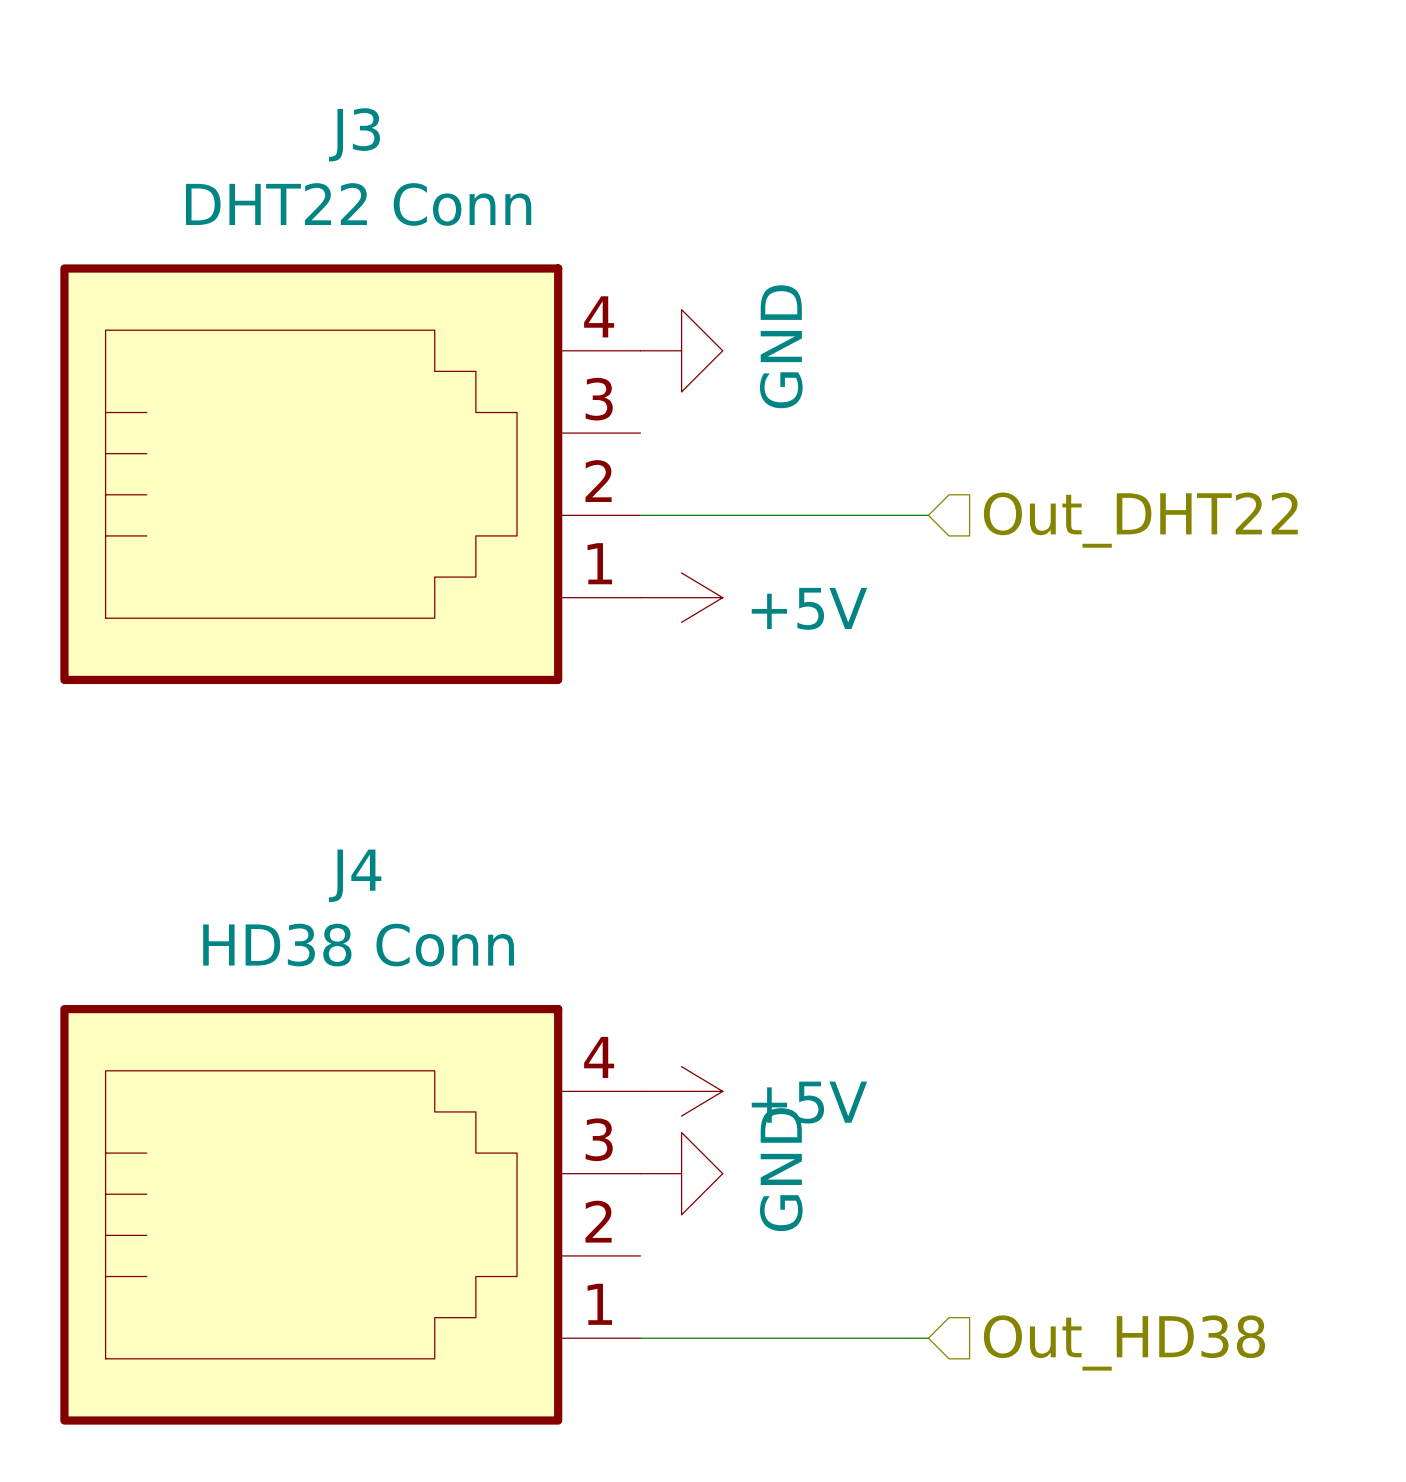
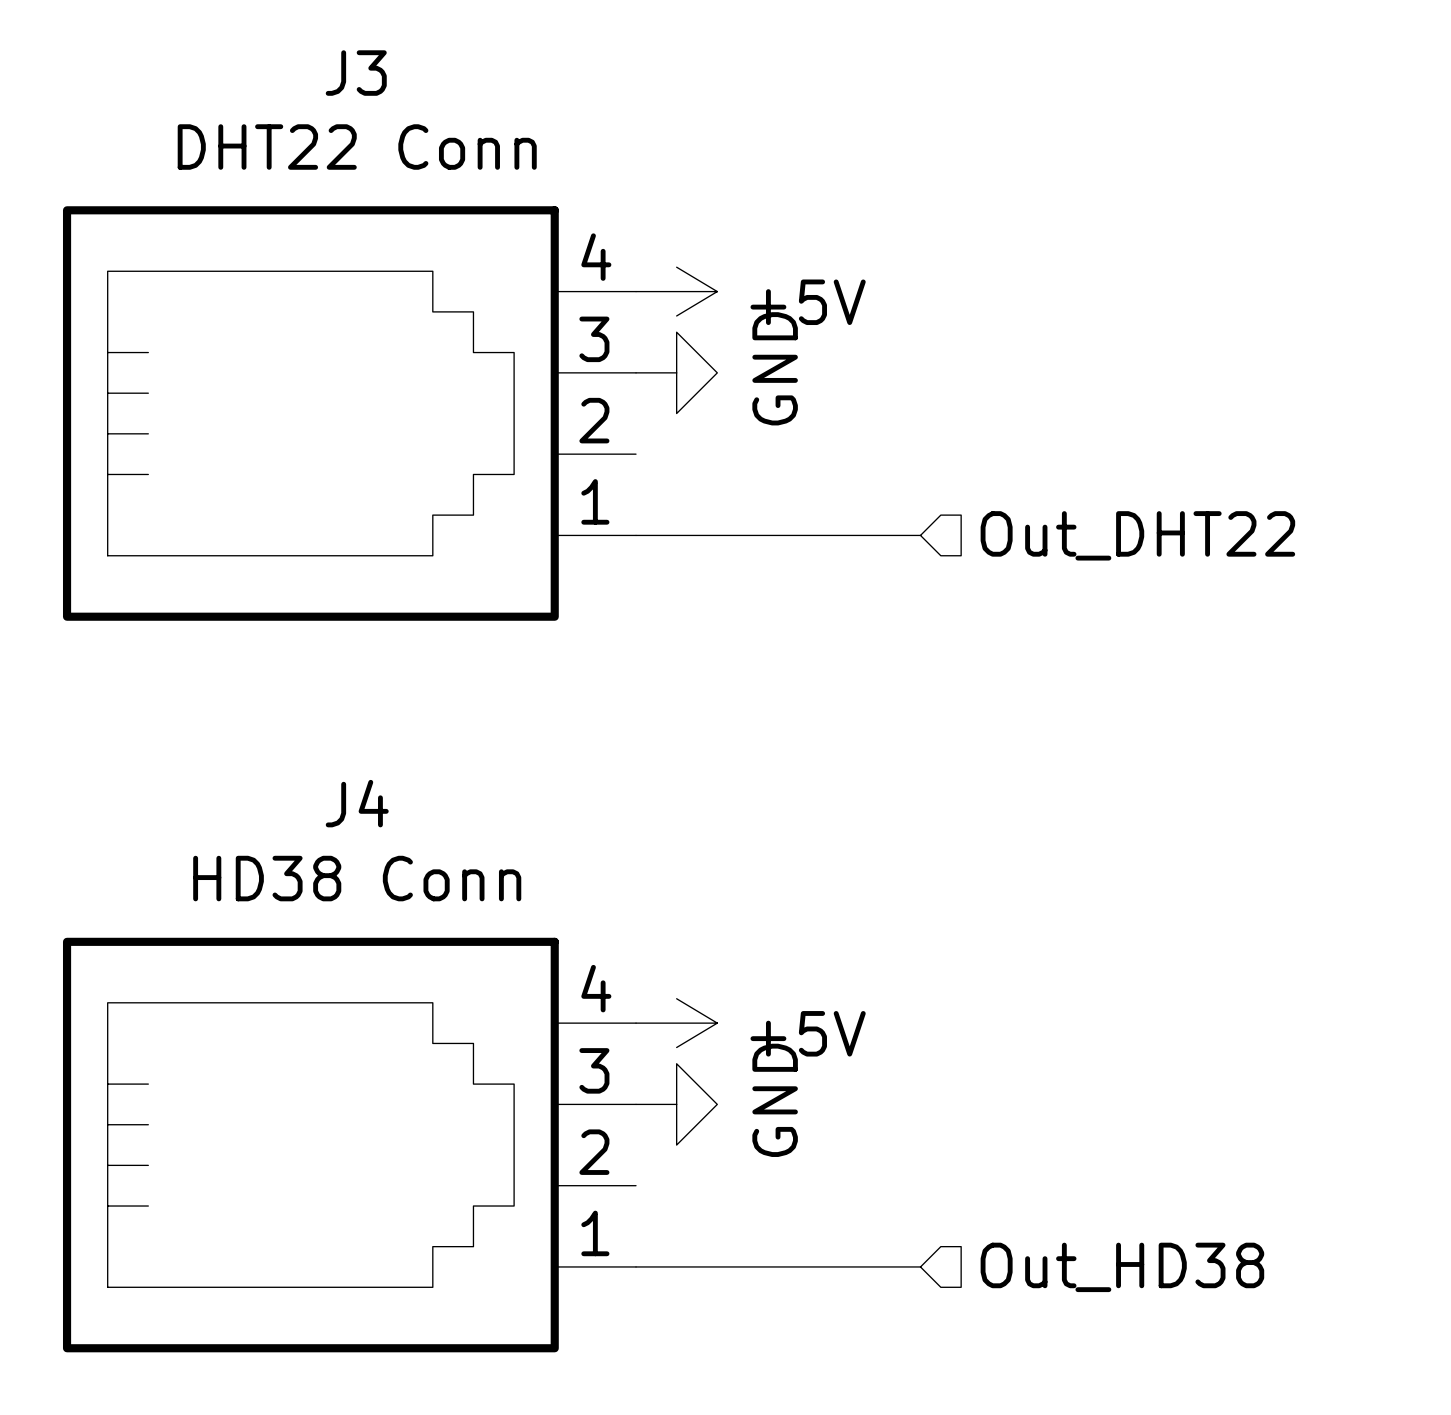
power symbol: GND (681, 350) -> +5V (676, 291)
power symbol: none -> GND (676, 372)
wire: (640, 515) (928, 515) -> (636, 535) (920, 535)
hierarchical label position: Out_DHT22 (1140, 520) -> Out_DHT22 (1137, 535)
power symbol: +5V (681, 597) -> none

